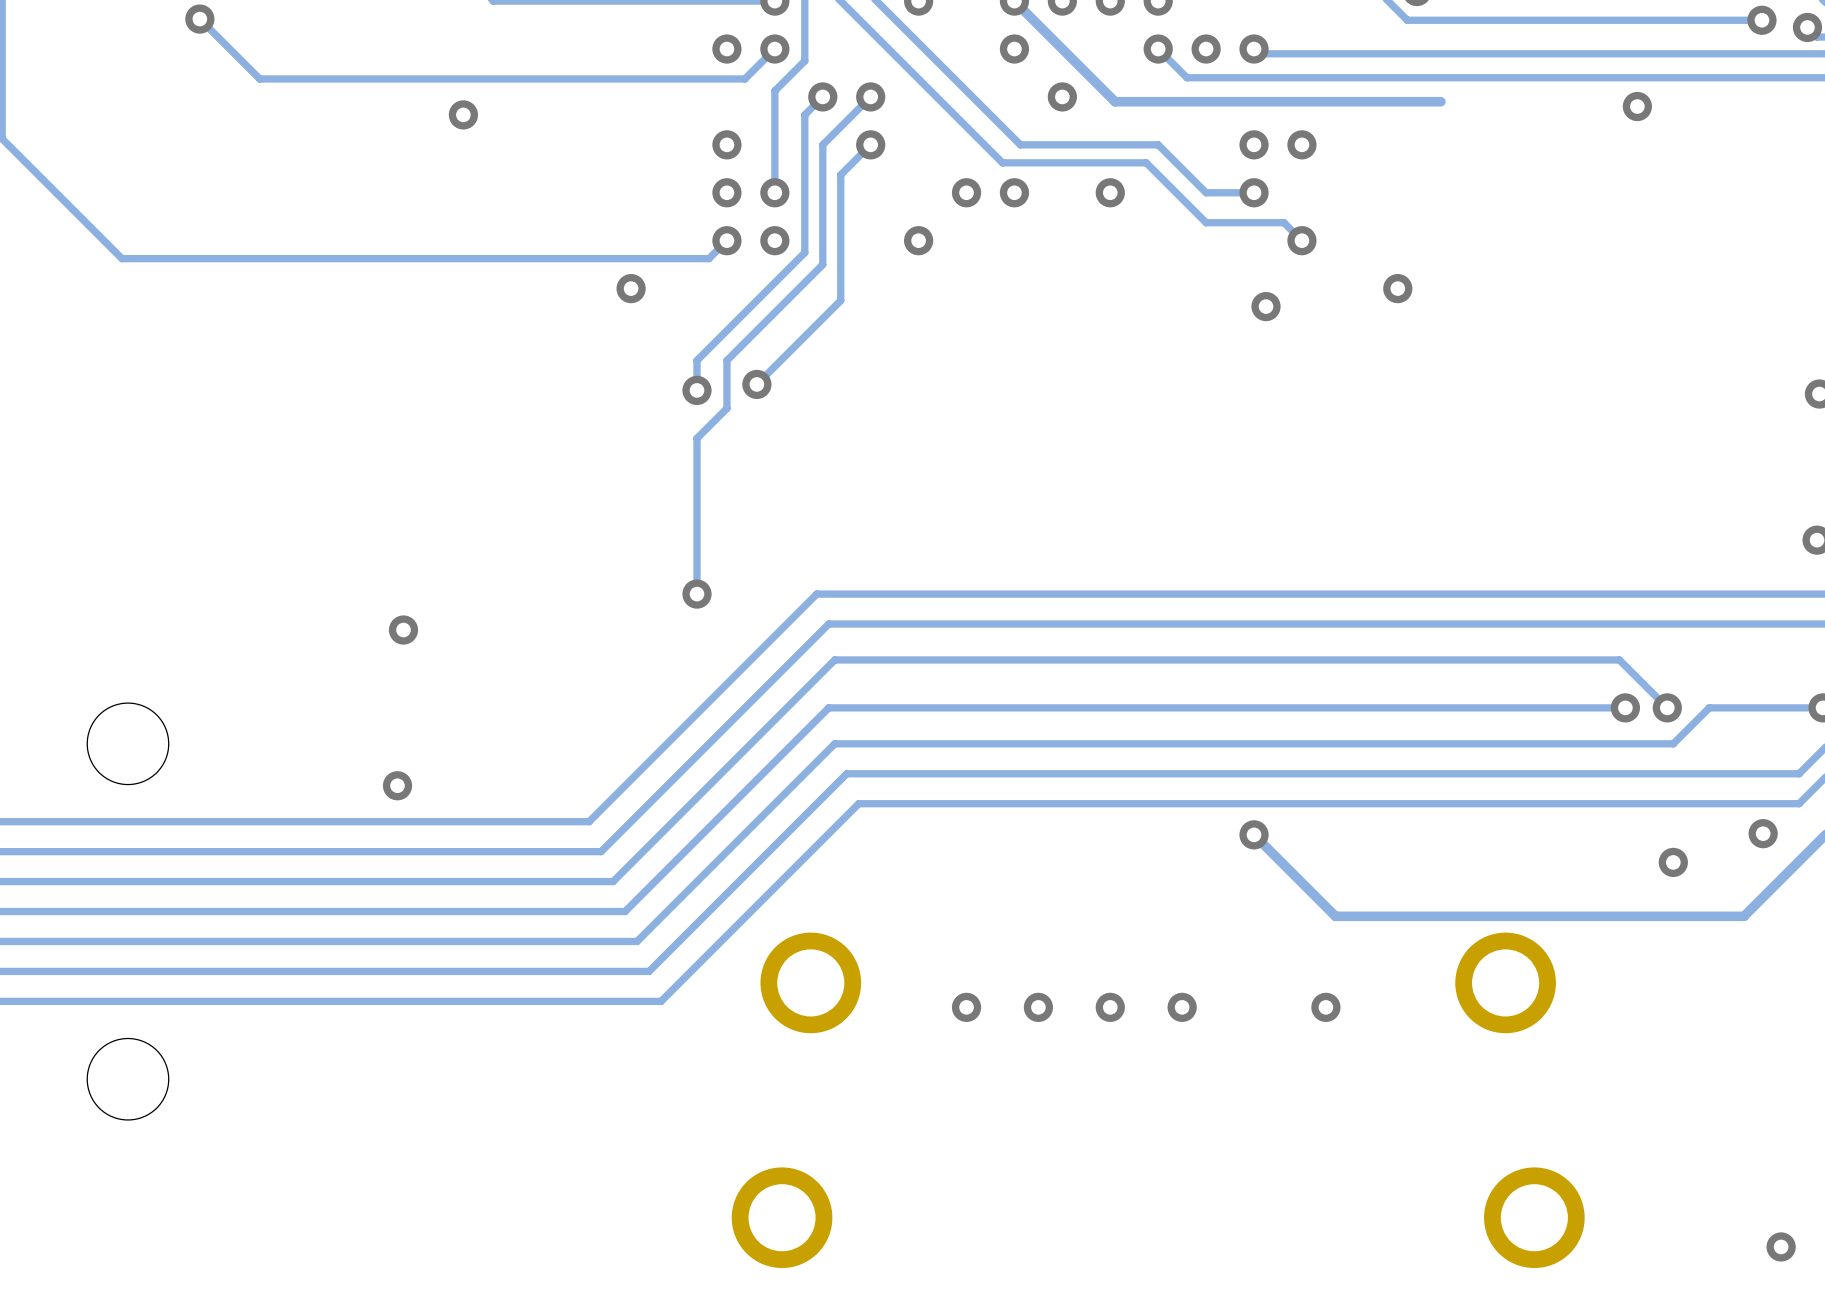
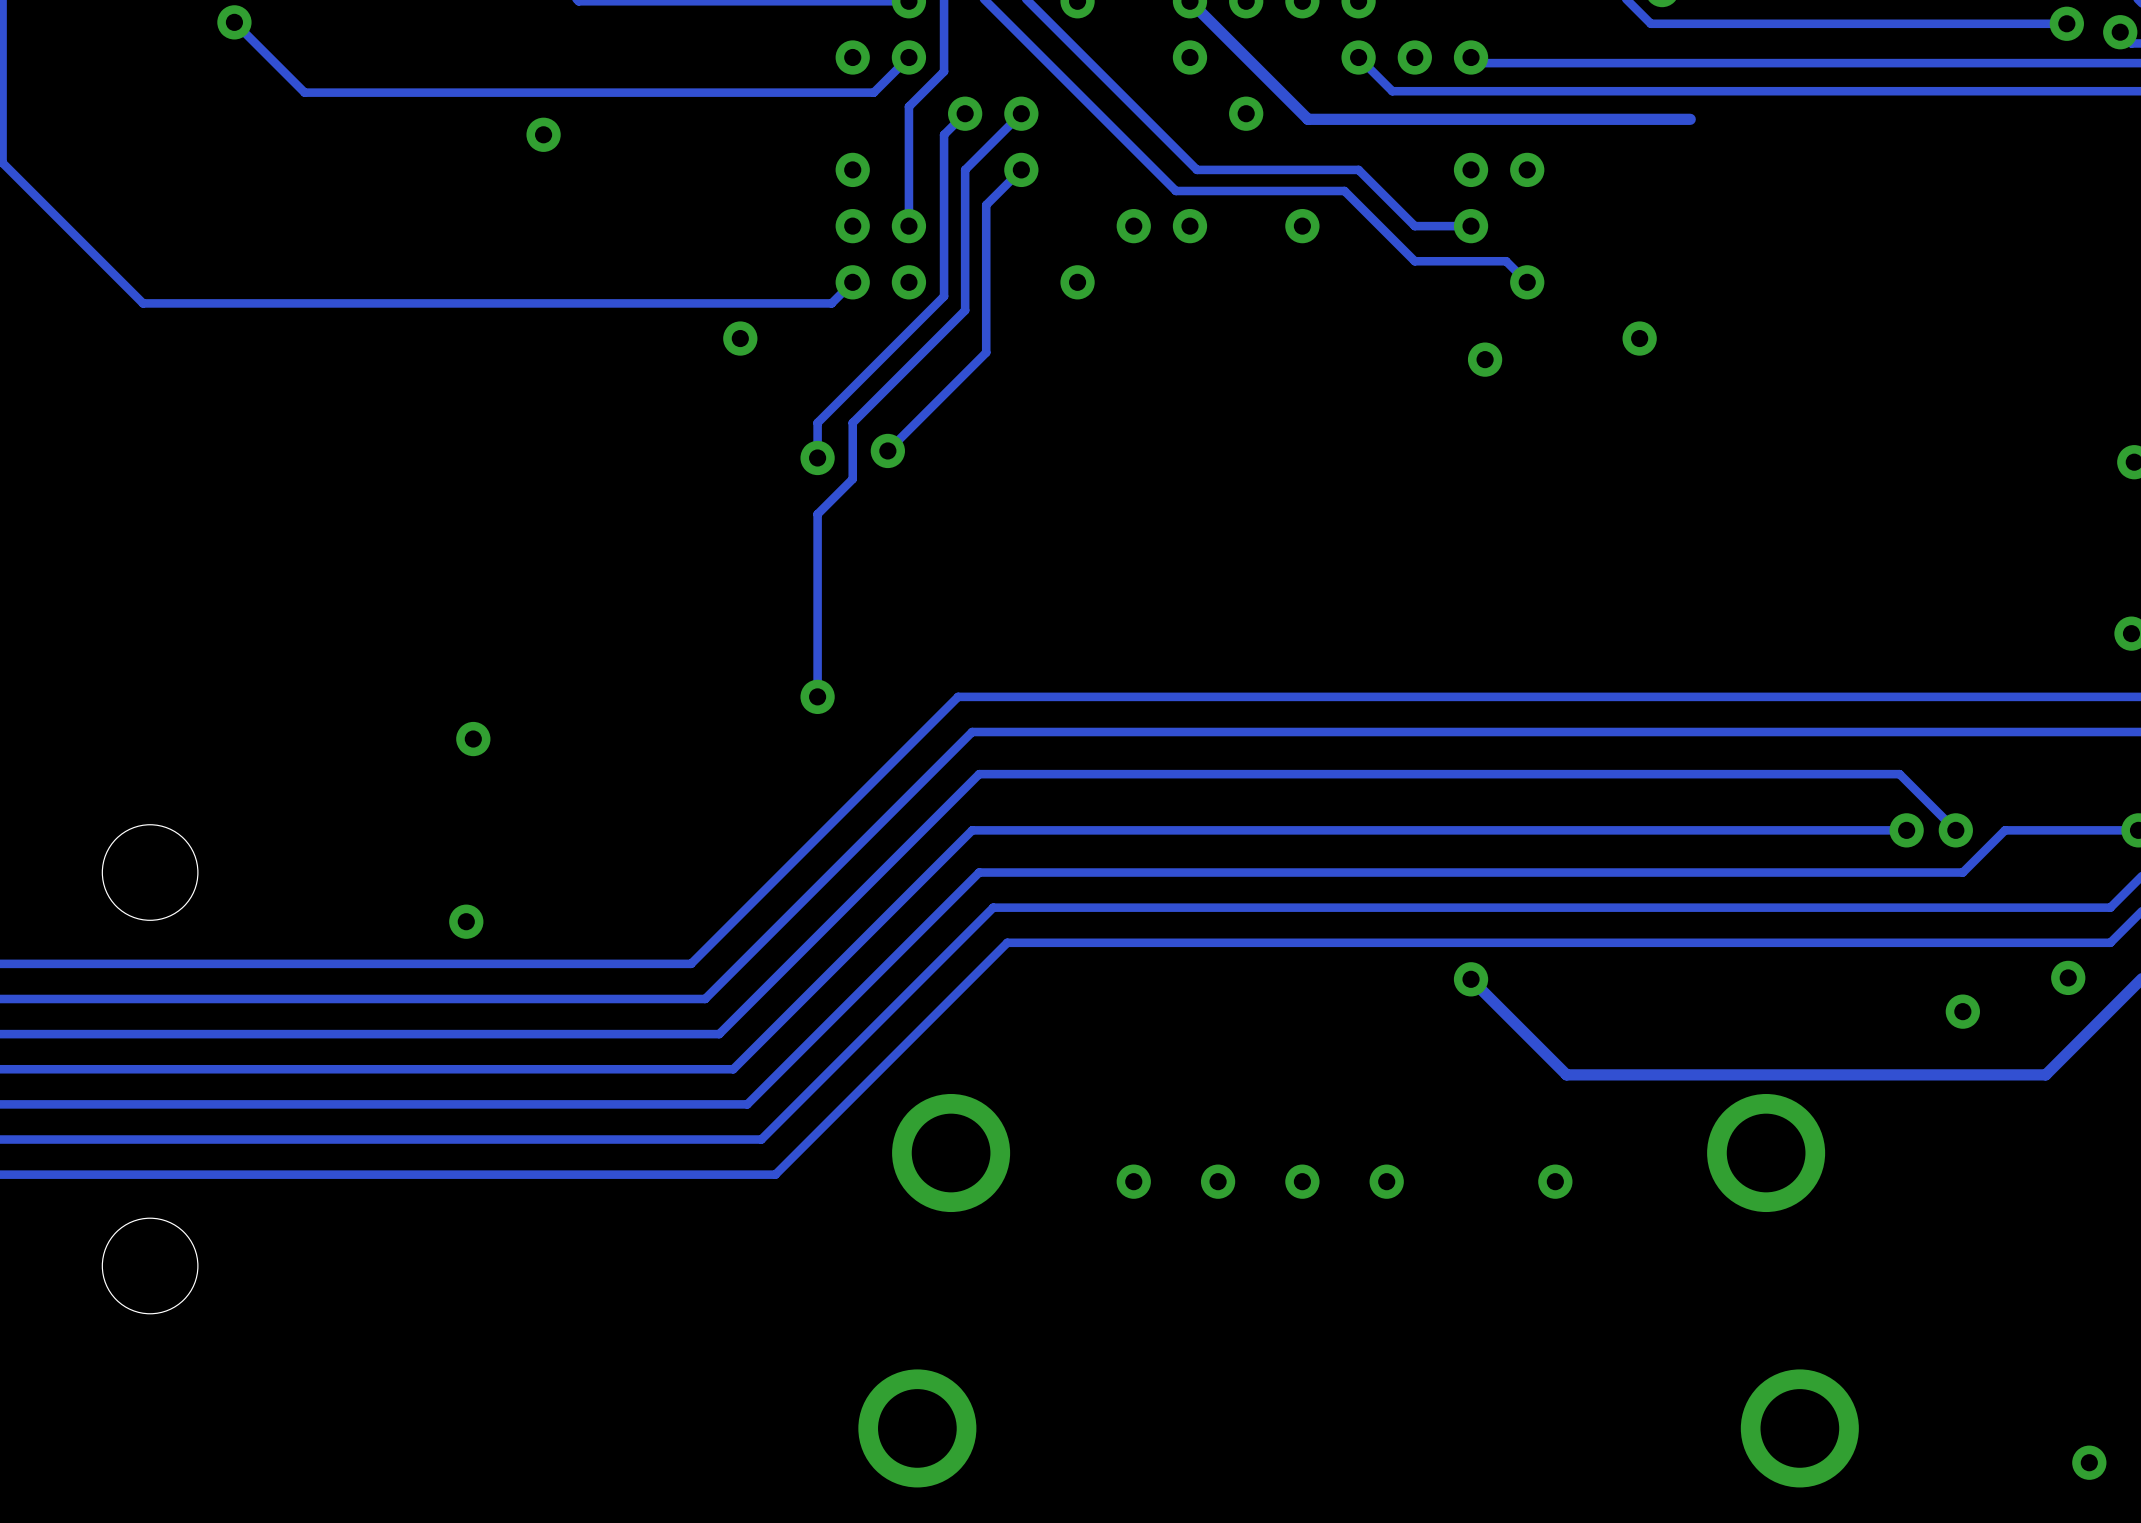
via: (1637, 106) -> none

